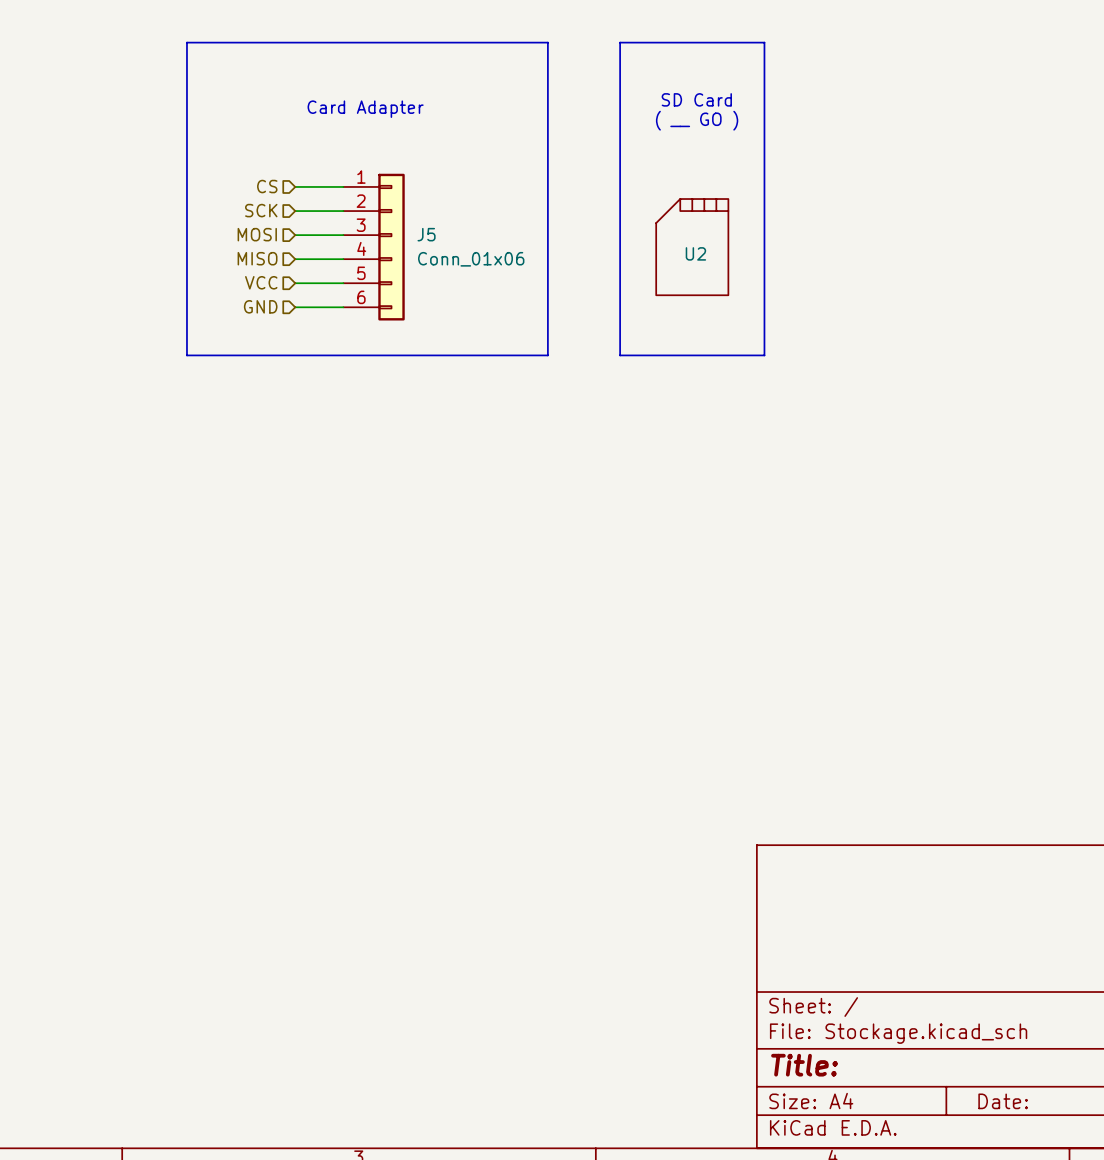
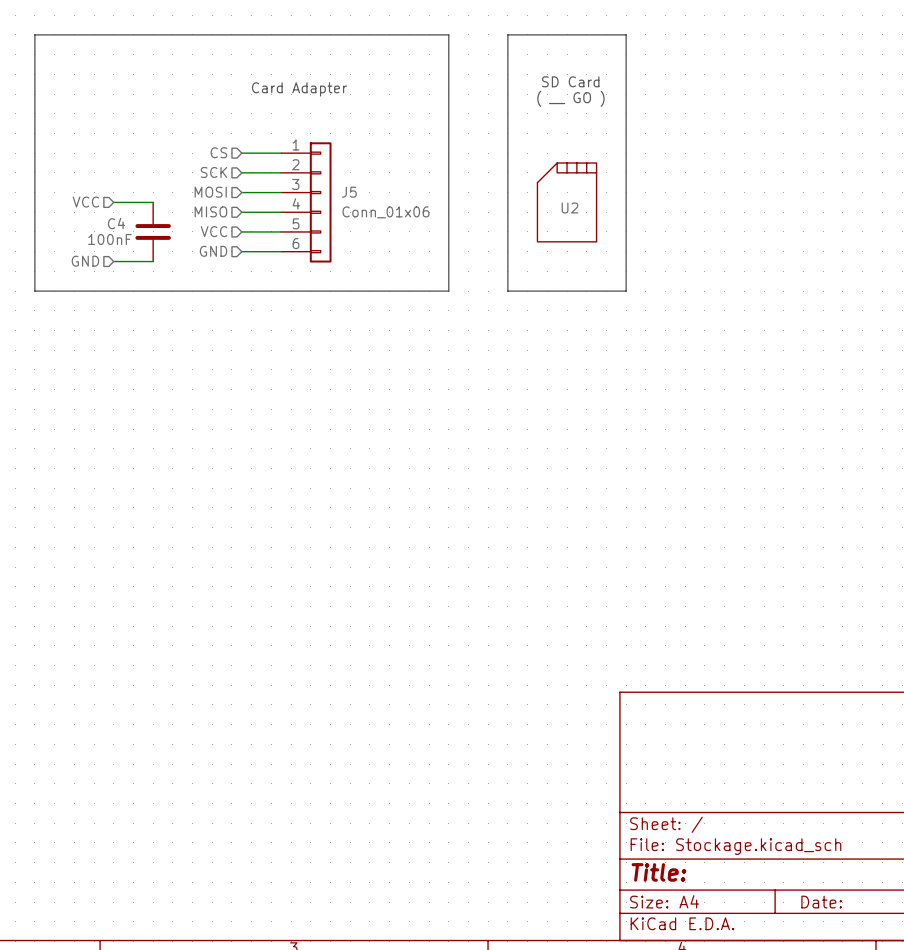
line: (186, 42) (186, 355) -> (153, 34) (34, 34) (34, 291) (153, 291)
hierarchical label: none -> VCC (85, 202)
wire: none -> (113, 202) (153, 202)
C4: none -> 100nF (153, 231)
hierarchical label: none -> GND (85, 261)
wire: none -> (113, 261) (153, 261)

